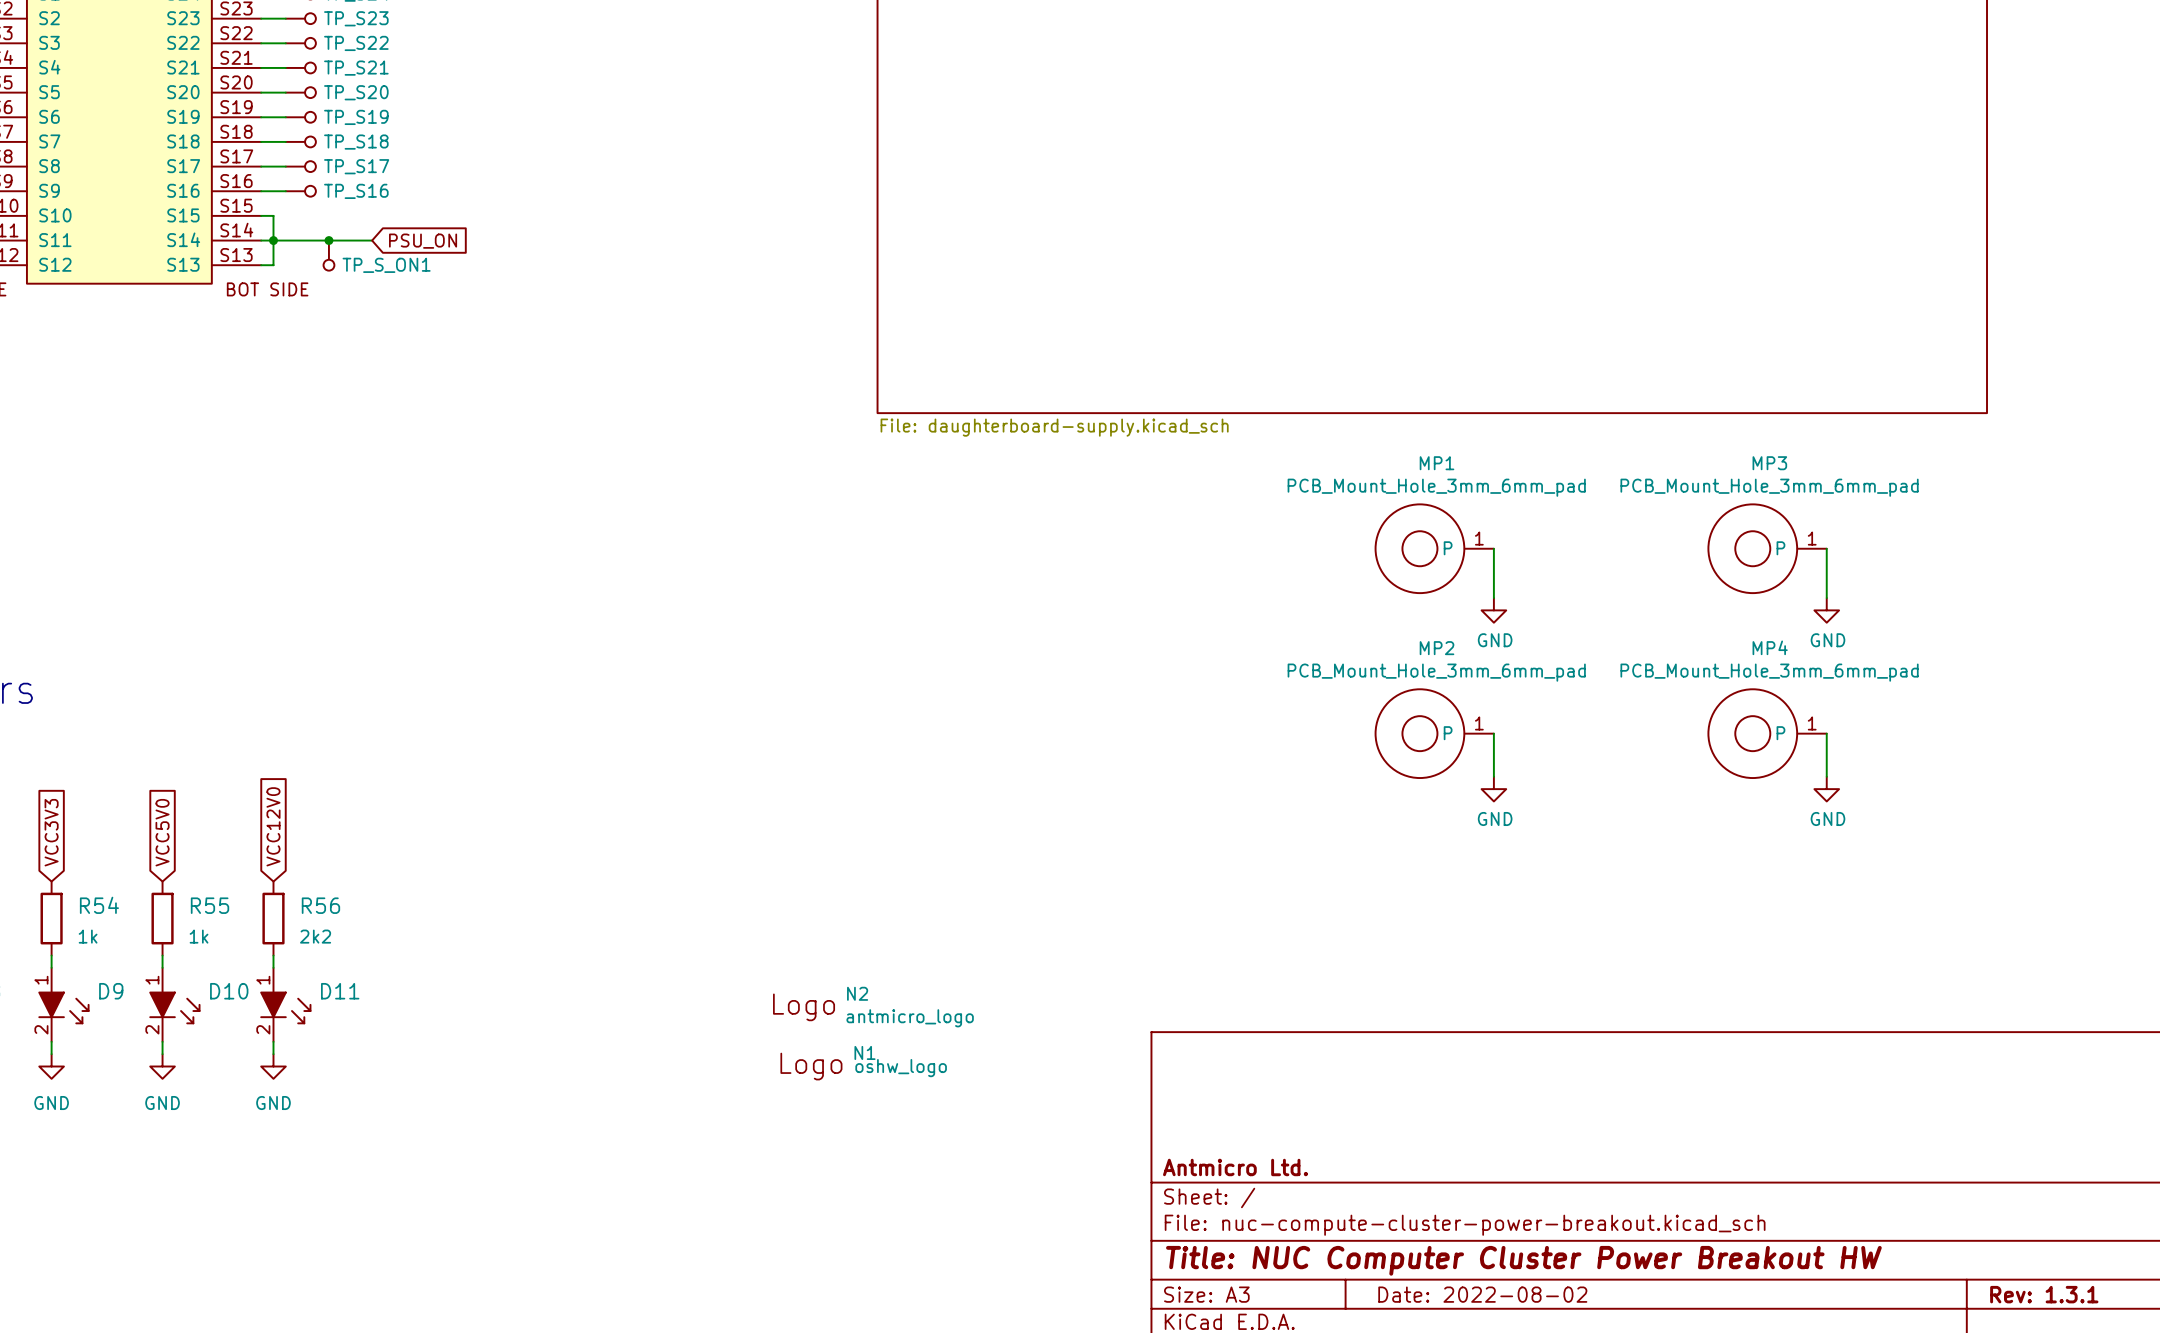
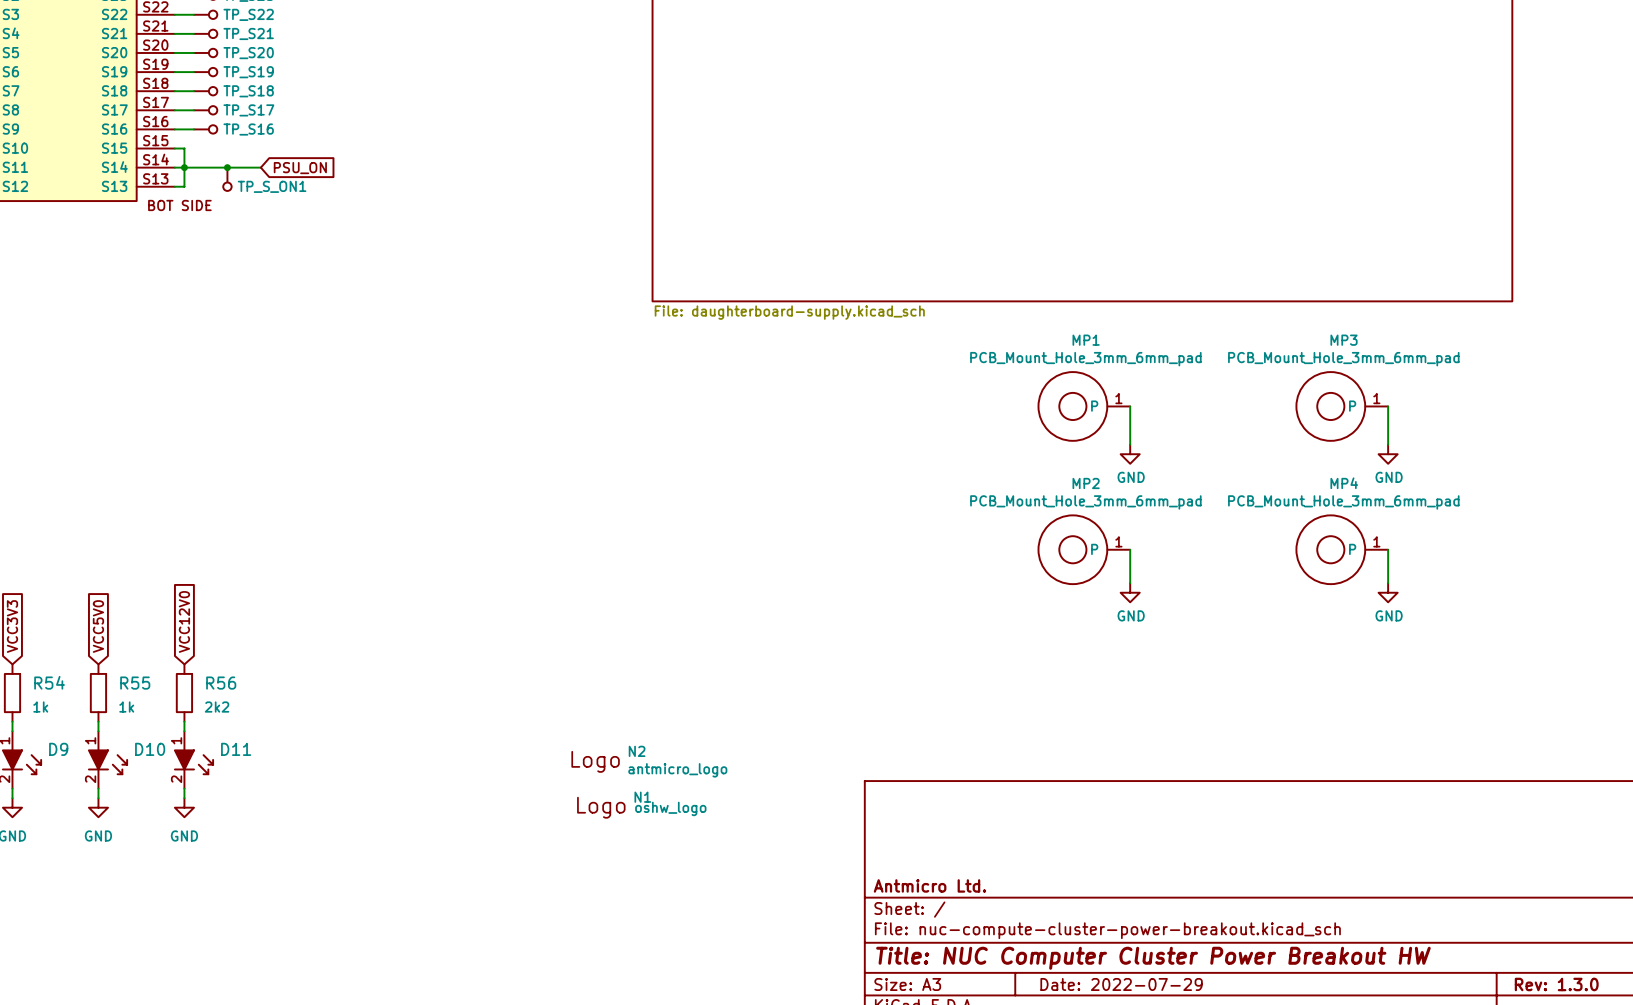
title block: Date: 2022-08-02 (1482, 1294) -> Date: 2022-07-29 (1121, 984)
title block: Rev: 1.3.1 (2044, 1294) -> Rev: 1.3.0 (1556, 984)

